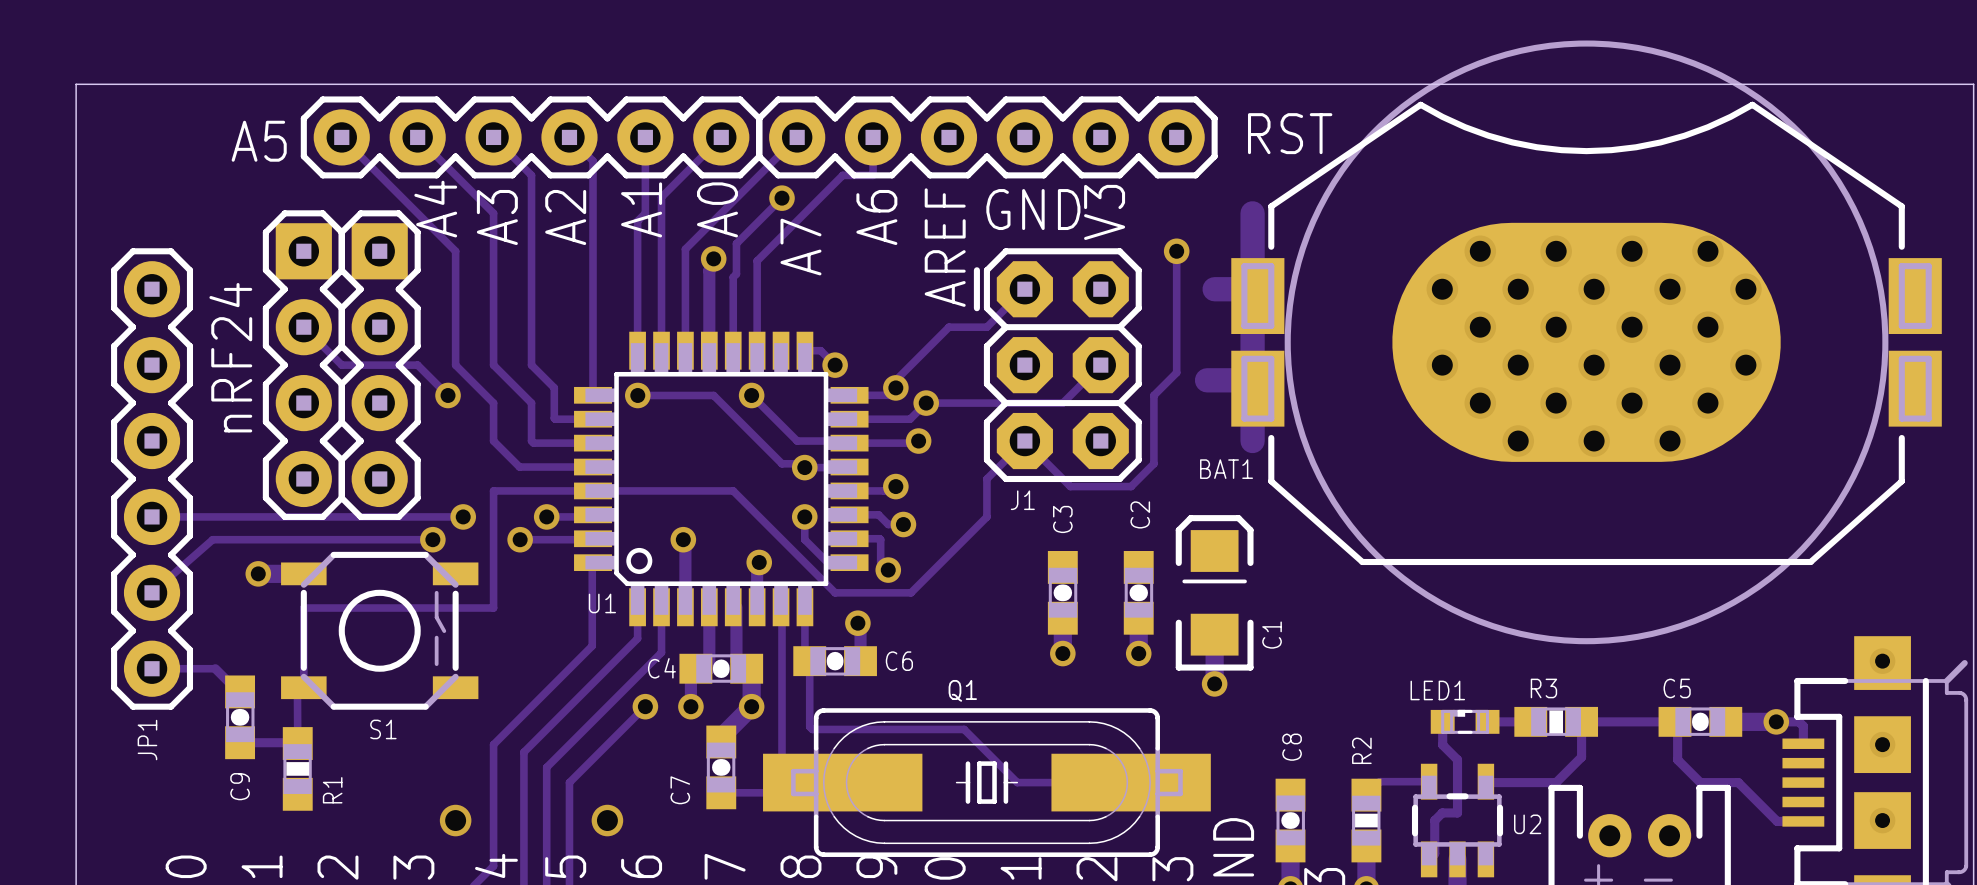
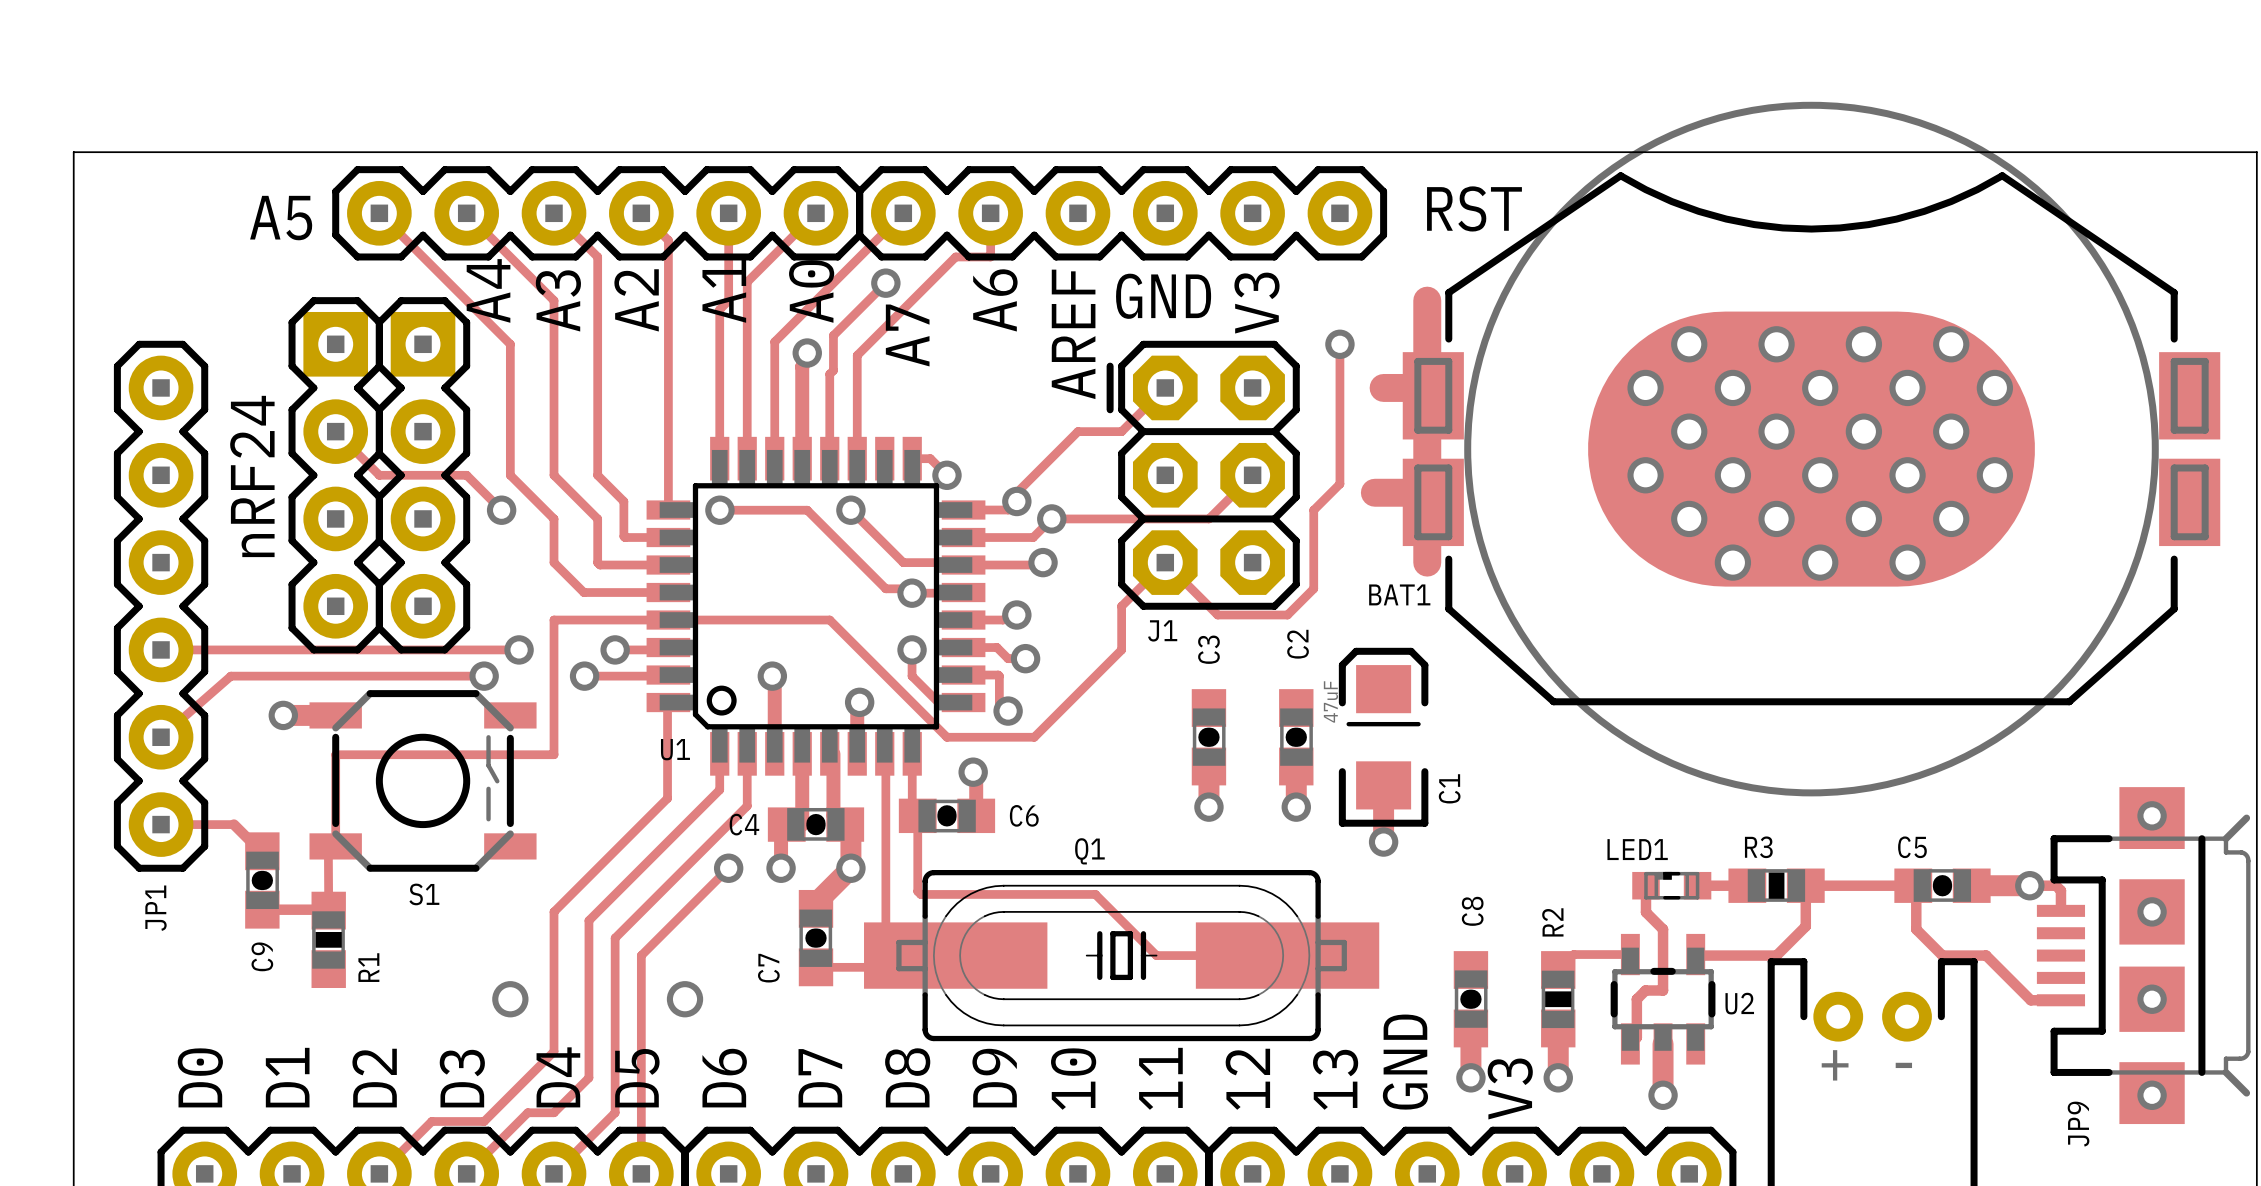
C1 value: none -> 47uF (1330, 701)

